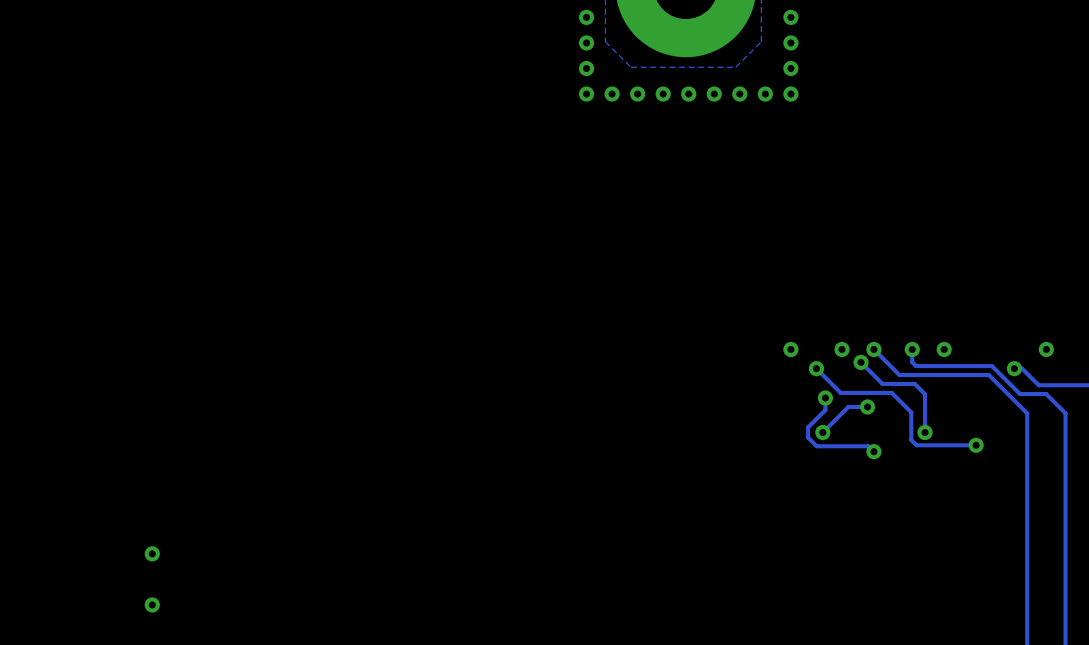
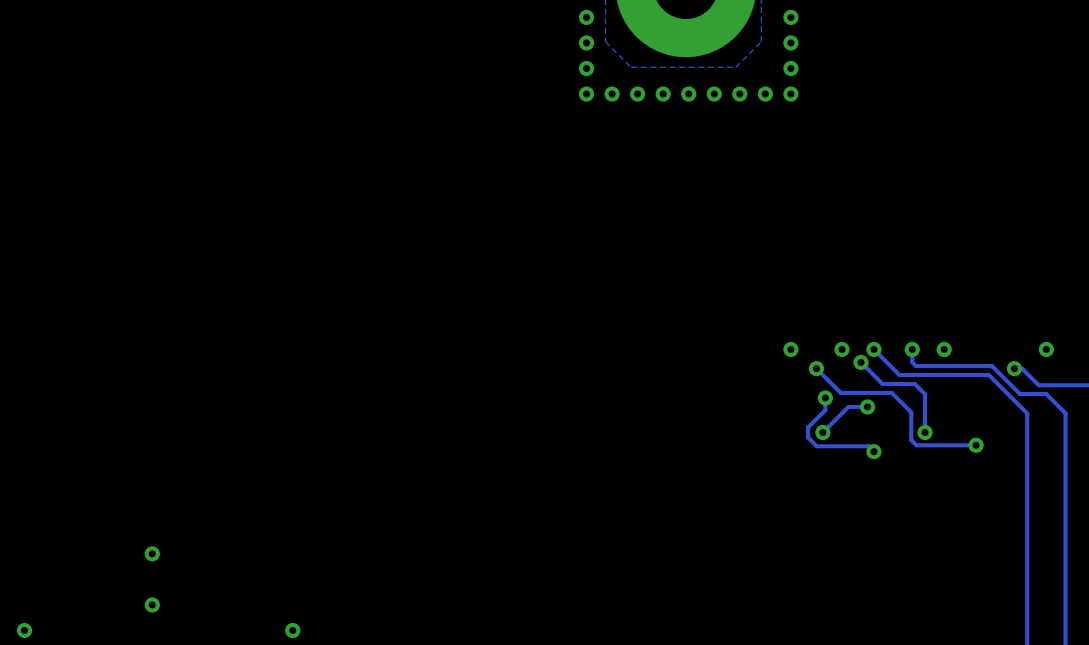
via: none -> (24, 630)
via: none -> (292, 630)

